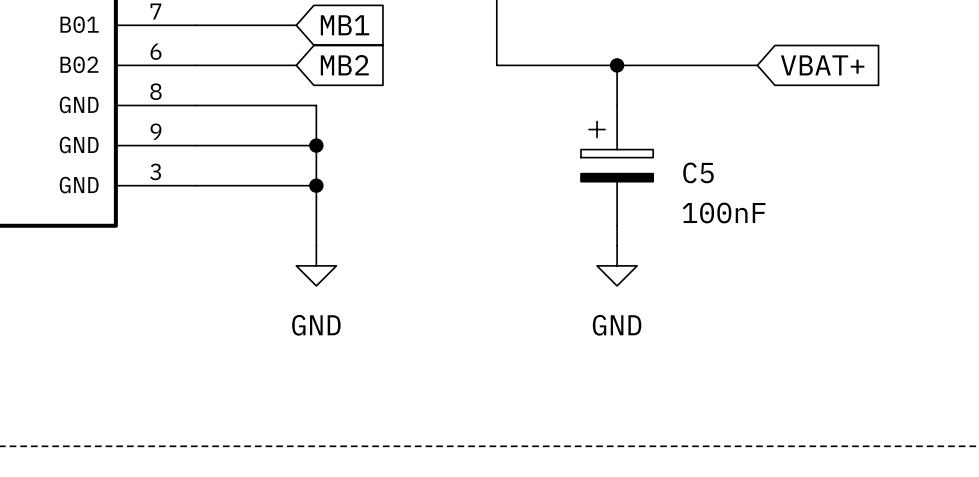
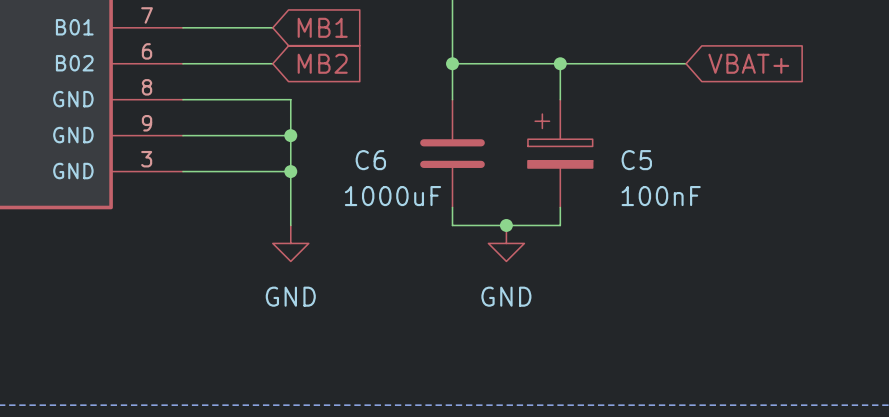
wire: none -> (452, 63) (452, 99)
junction: none -> (452, 63)
C6: none -> 1000uF (452, 153)
wire: none -> (452, 207) (452, 225) (560, 225)
junction: none -> (506, 225)
power symbol position: GND (617, 265) -> GND (506, 243)

